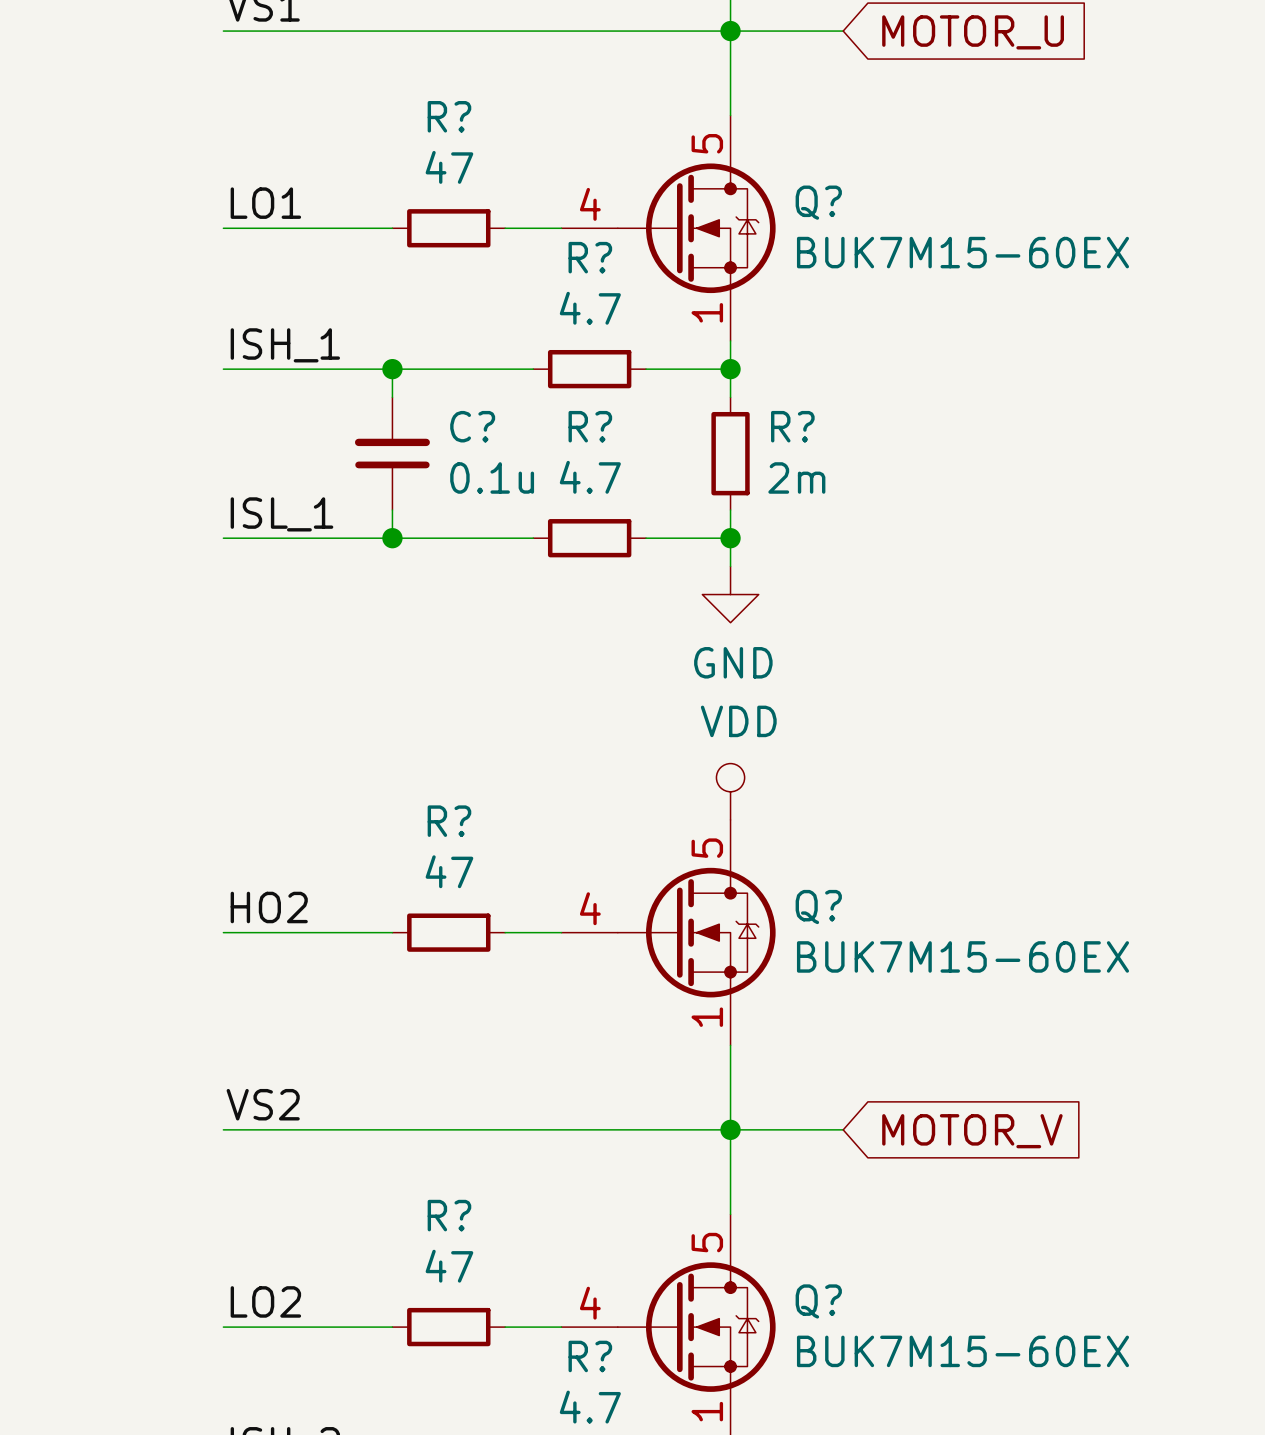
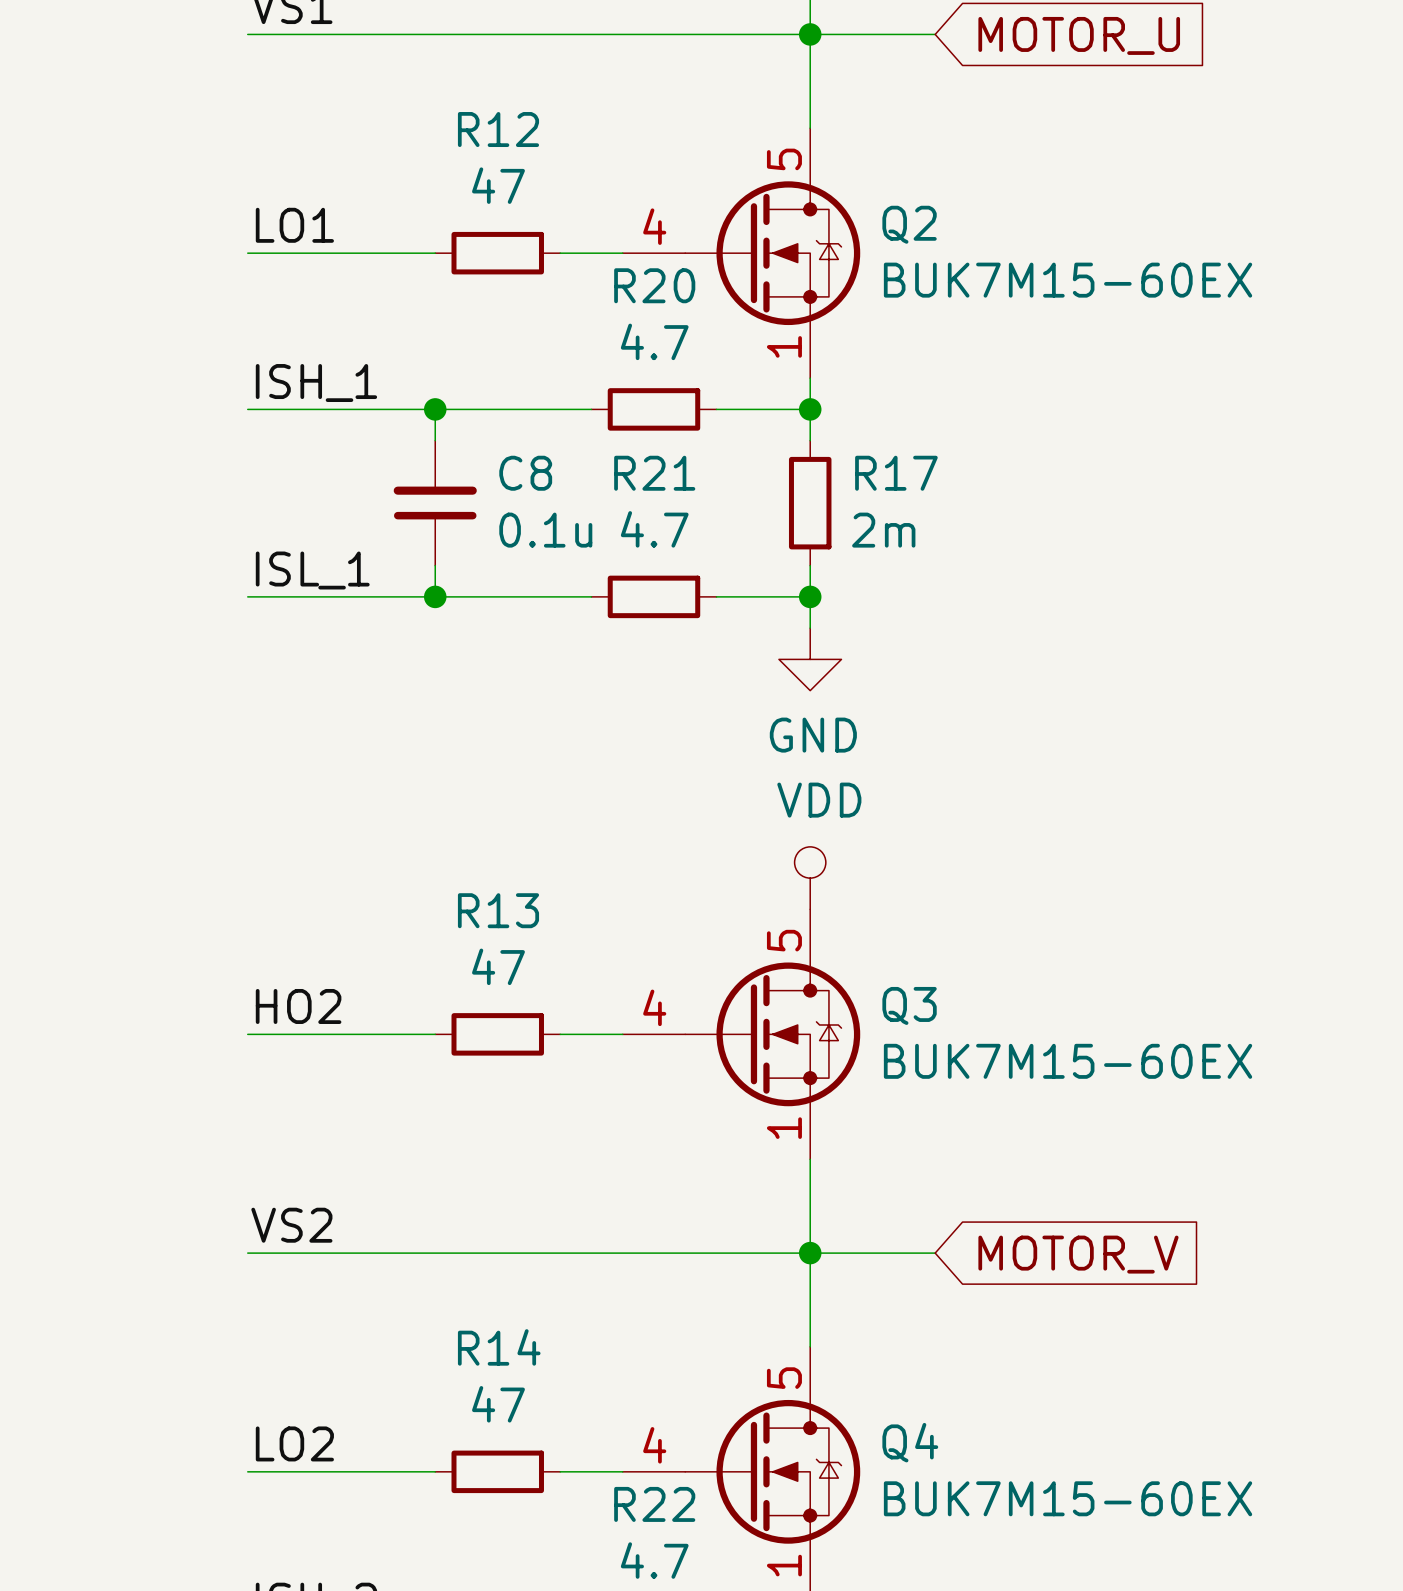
R? name: R? (449, 116) -> R12 (498, 129)
Q? name: Q? (818, 202) -> Q2 (909, 224)
R? name: R? (590, 257) -> R20 (654, 285)
C? name: C? (472, 426) -> C8 (525, 473)
R? name: R? (590, 426) -> R21 (654, 473)
R? name: R? (792, 426) -> R17 (896, 473)
R? name: R? (449, 821) -> R13 (498, 910)
Q? name: Q? (818, 907) -> Q3 (909, 1005)
R? name: R? (449, 1215) -> R14 (499, 1347)
Q? name: Q? (818, 1301) -> Q4 (910, 1442)
R? name: R? (590, 1356) -> R22 (654, 1504)

